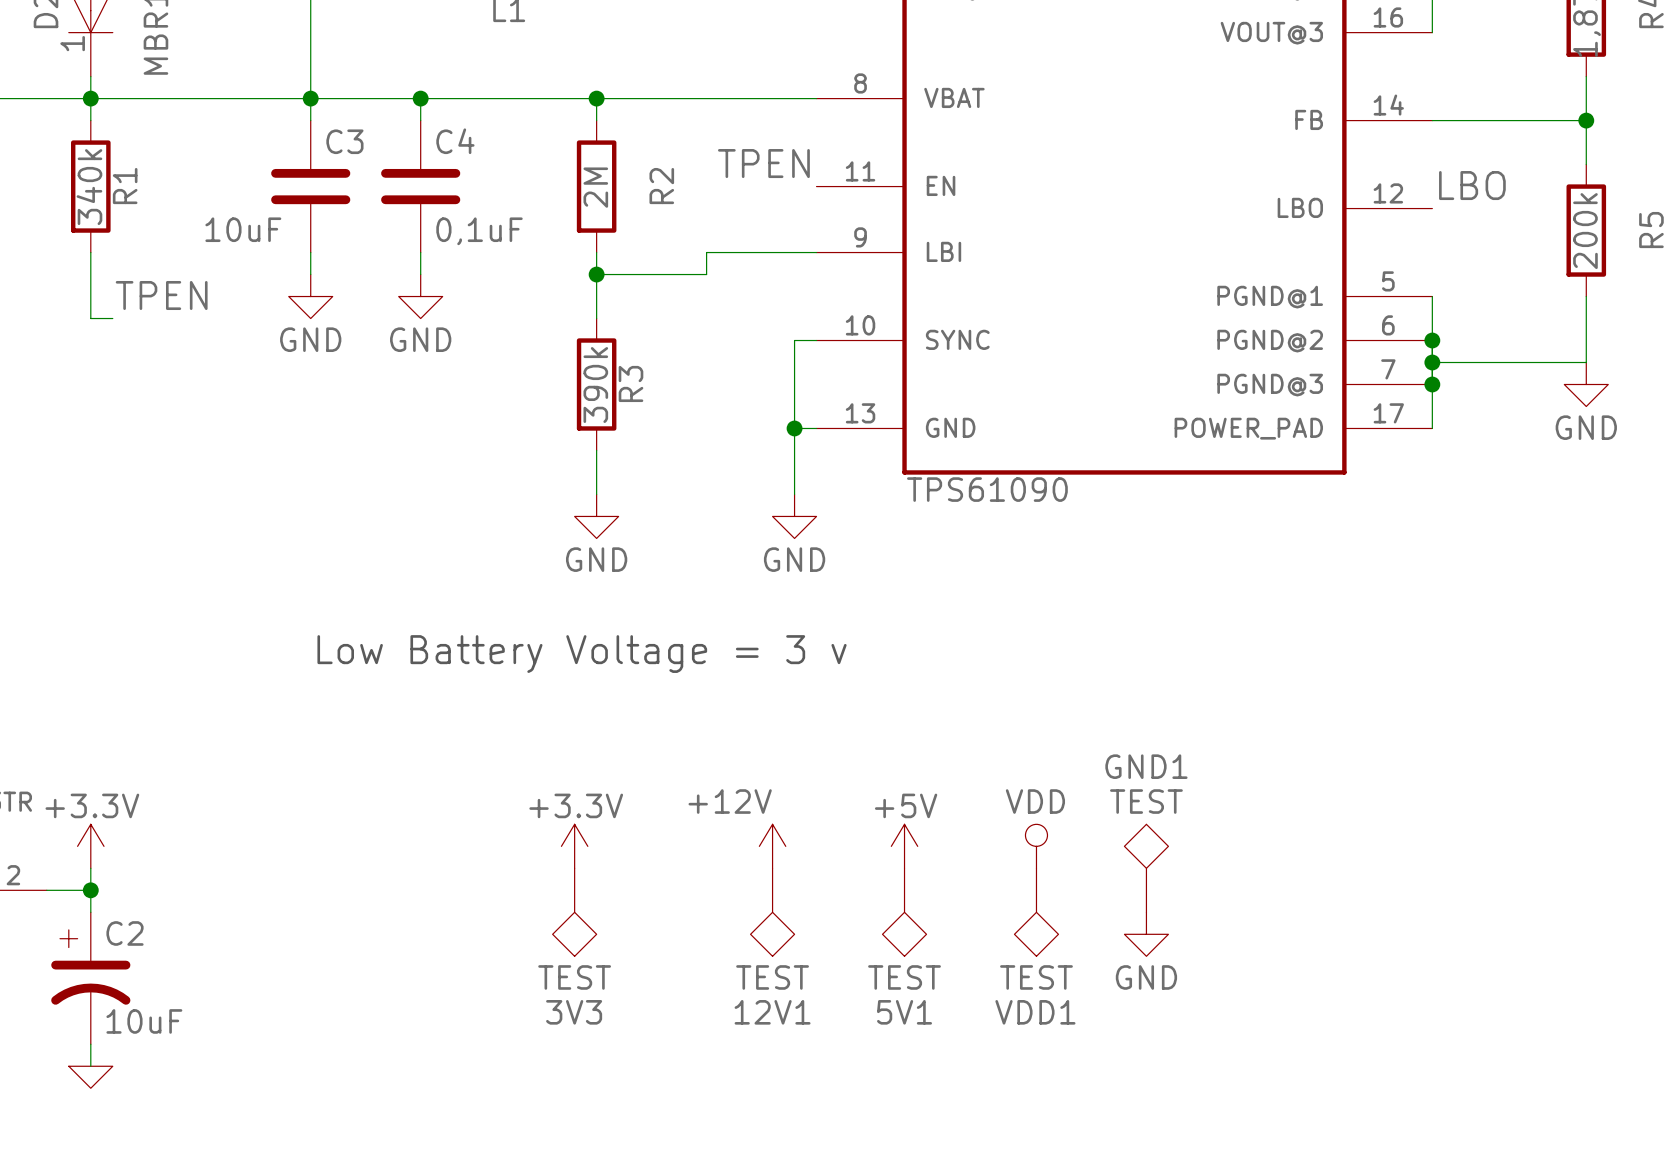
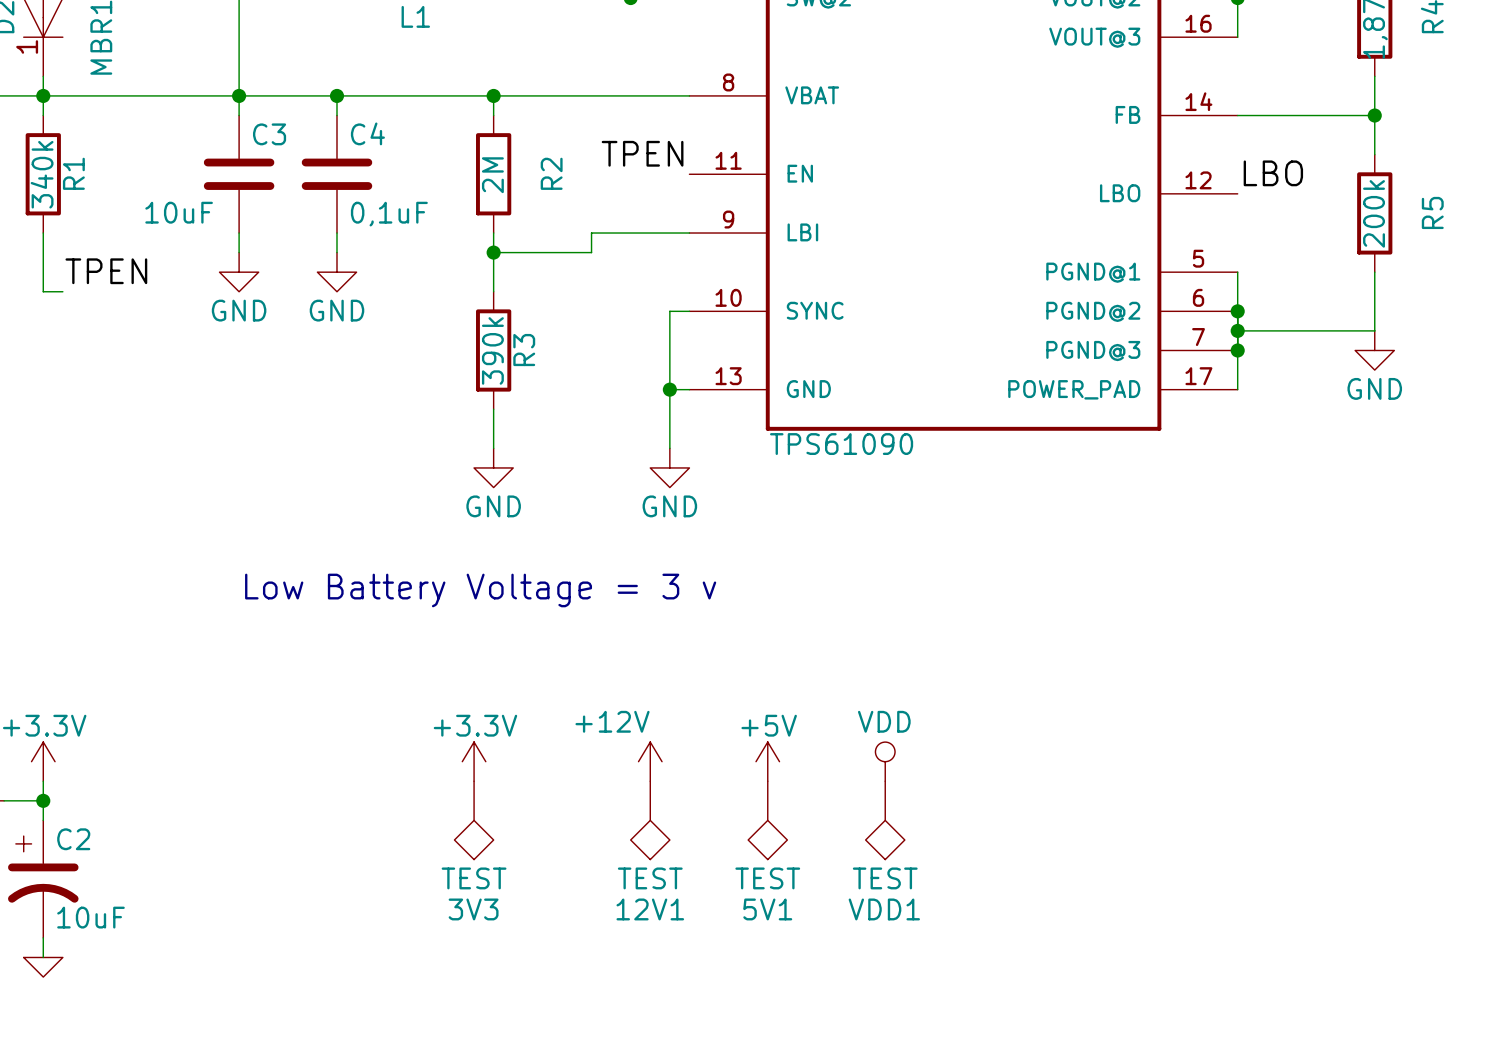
GND1: TEST (1146, 868) -> none
power symbol: GND (1146, 934) -> none

